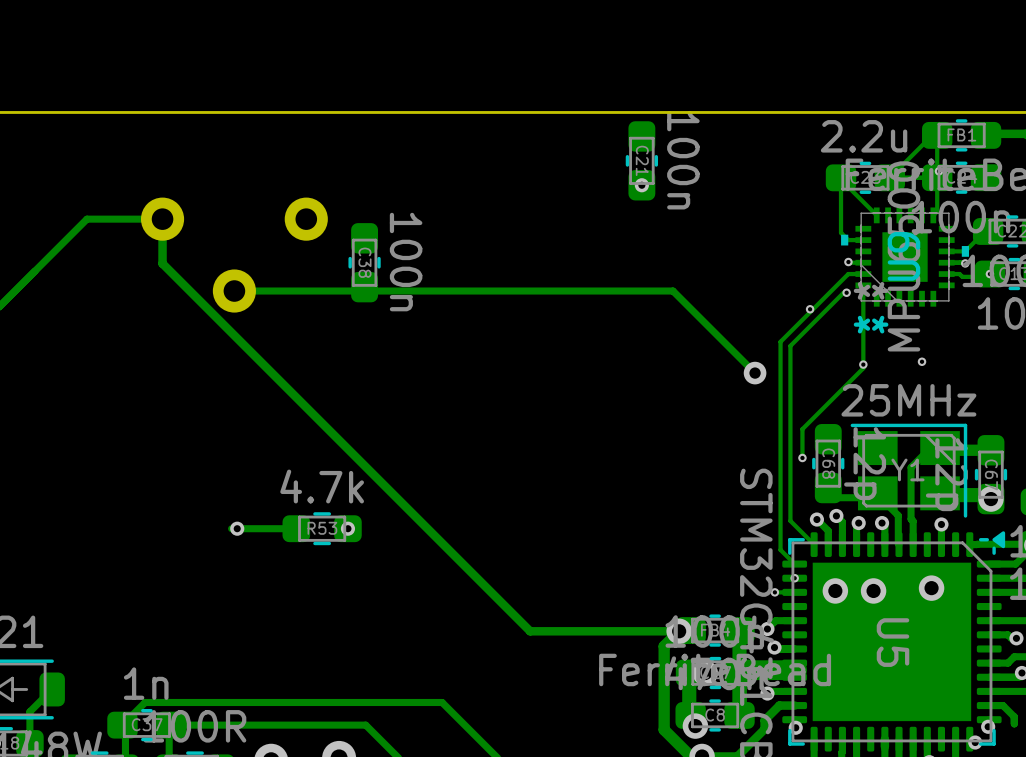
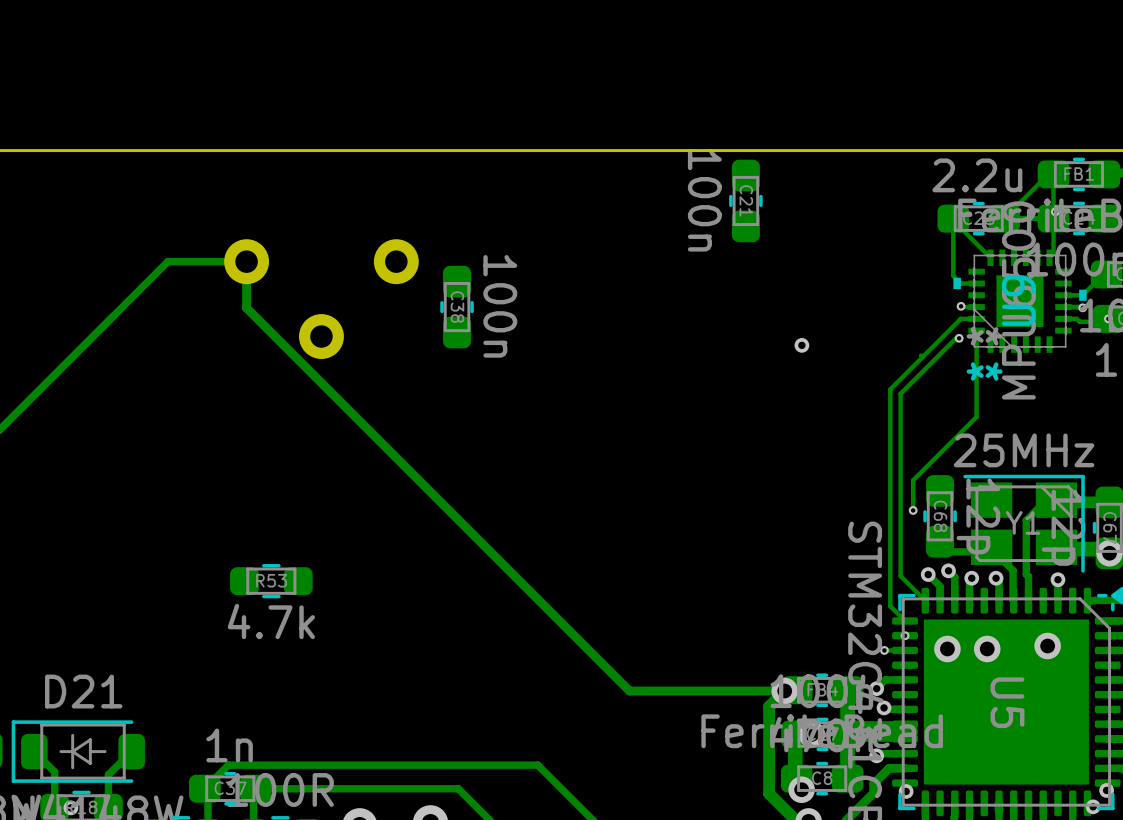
C21 value position: 100n (683, 160) -> 100n (704, 200)
via position: (641, 185) -> (801, 345)
track: (234, 291) (673, 291) (755, 373) -> none
via: (810, 309) -> none
via: (922, 361) -> none
via: (863, 364) -> none
via: (755, 373) -> none
R53 value position: 4.7k (322, 486) -> 4.7k (271, 621)
via: (237, 528) -> none
track: (296, 528) (231, 528) -> none
R53 position: (322, 528) -> (271, 581)
via: (347, 528) -> none

